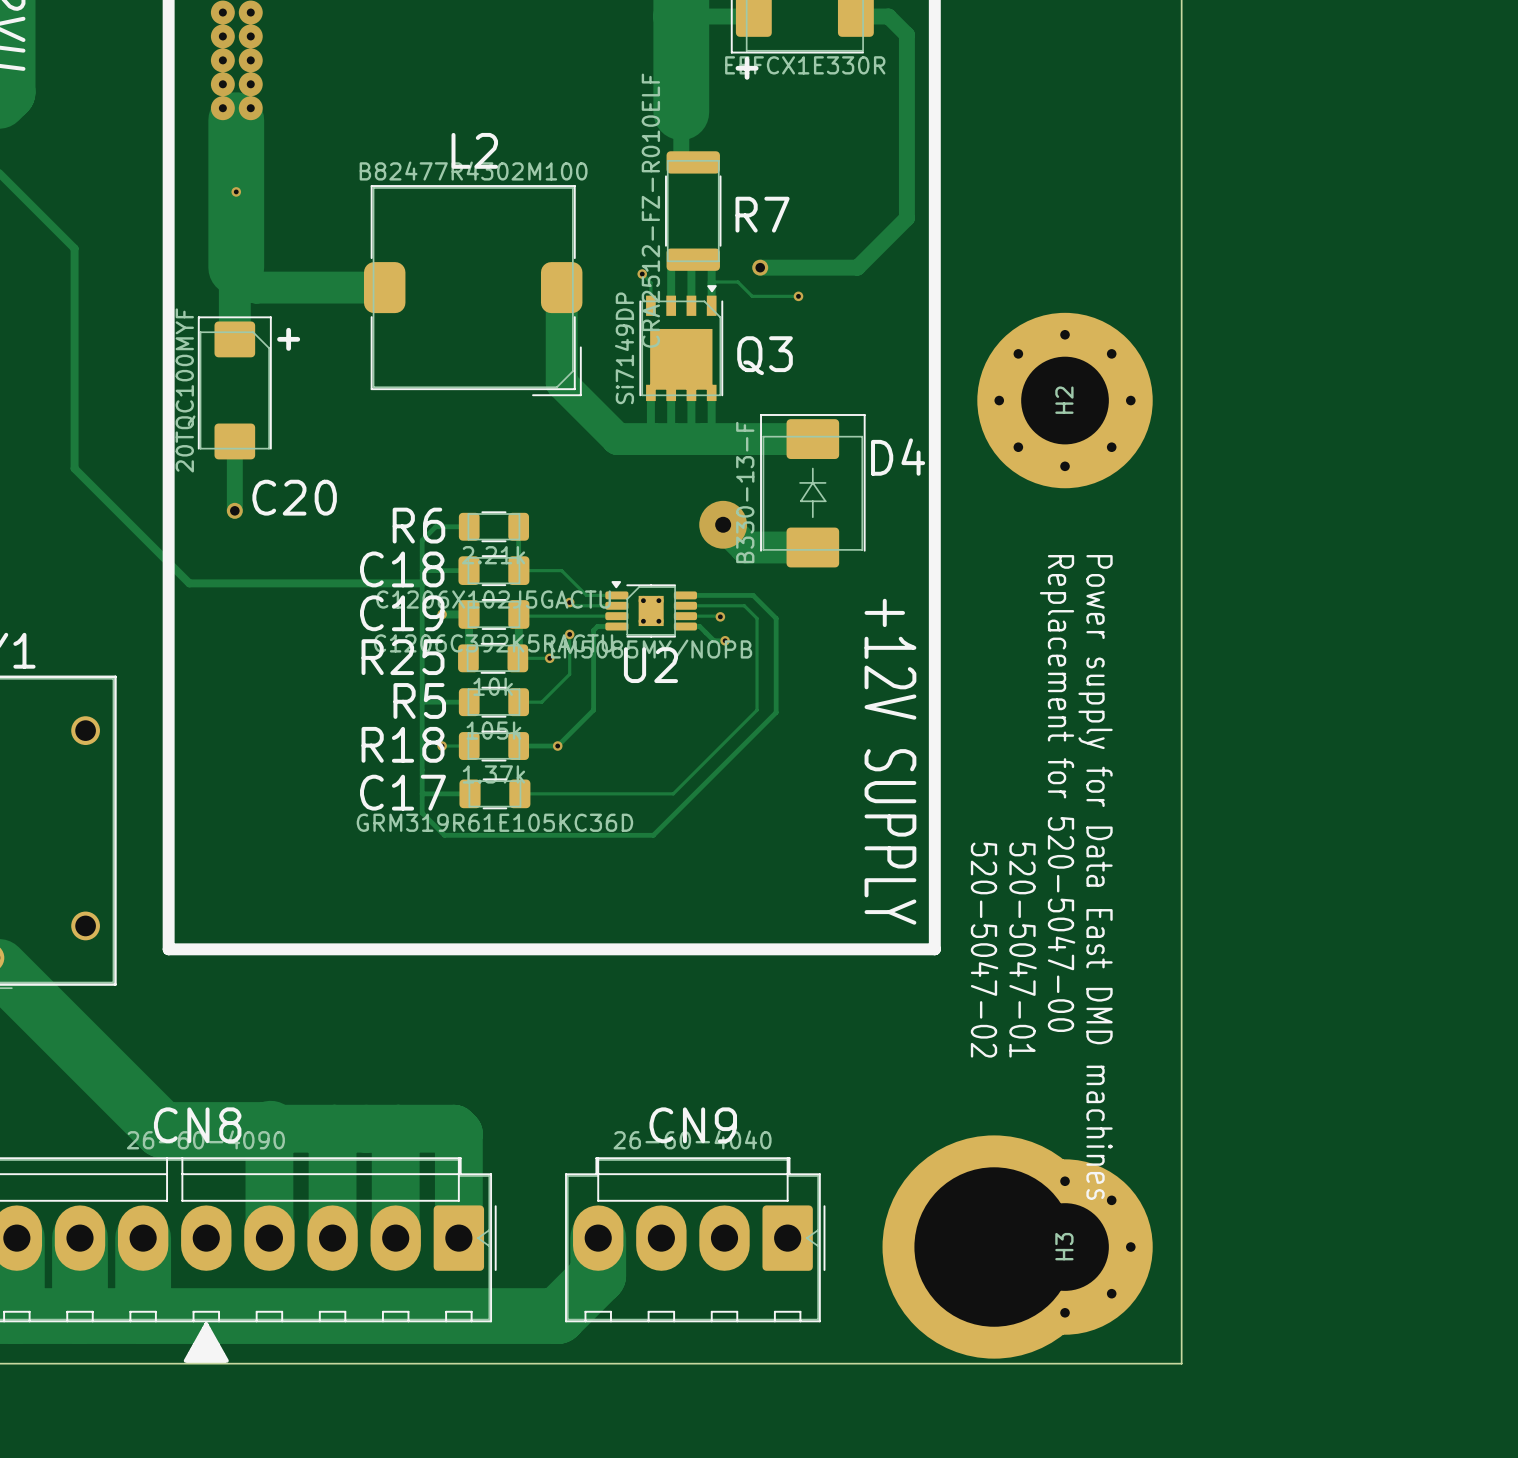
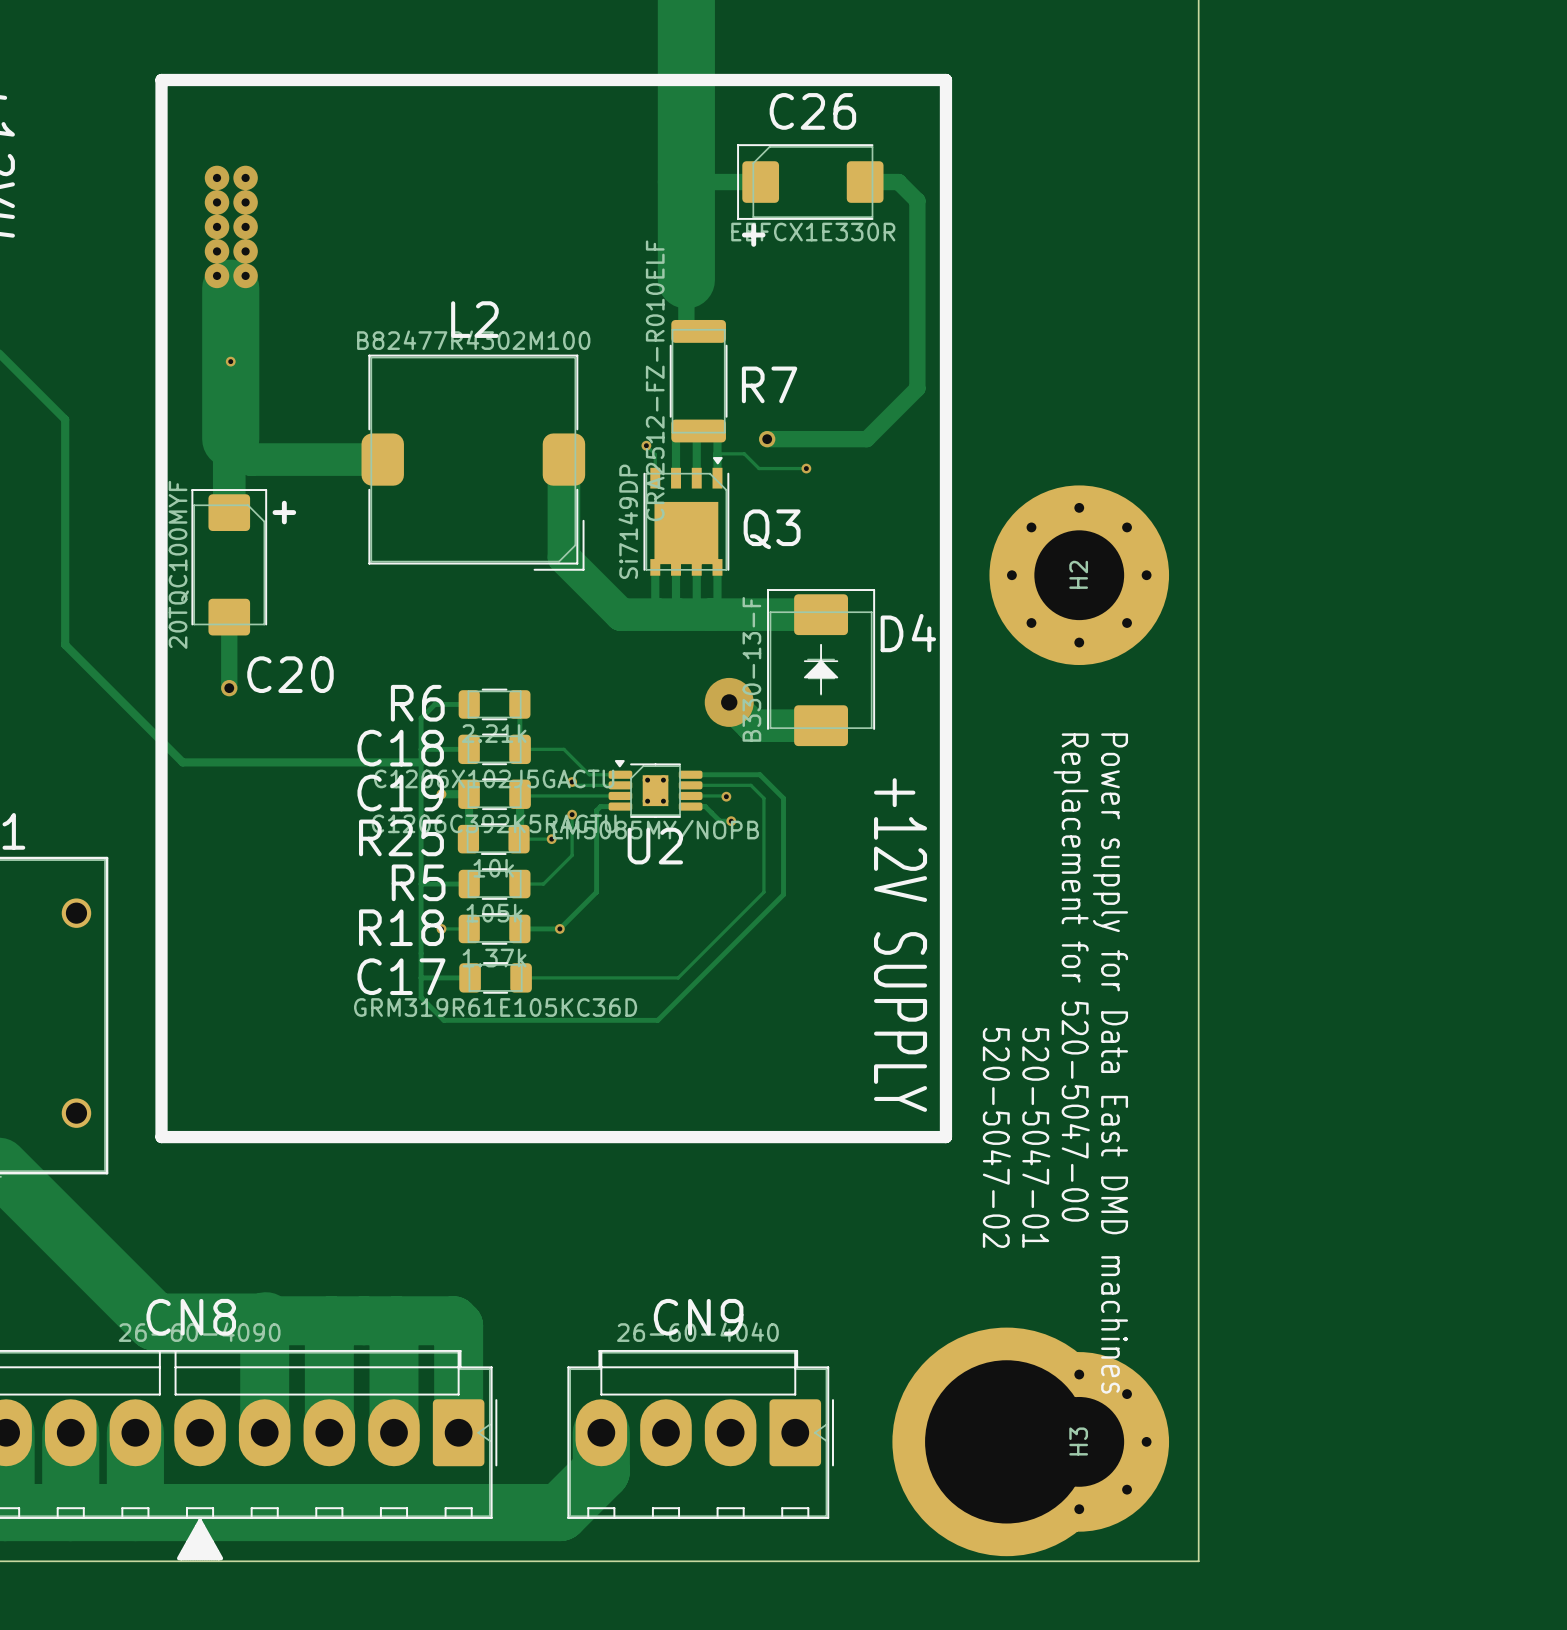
line: none -> (821, 644) (821, 661)
drawing: none -> [803, 660, 839, 679]
line: none -> (804, 661) (837, 661)
line: none -> (821, 677) (821, 693)

